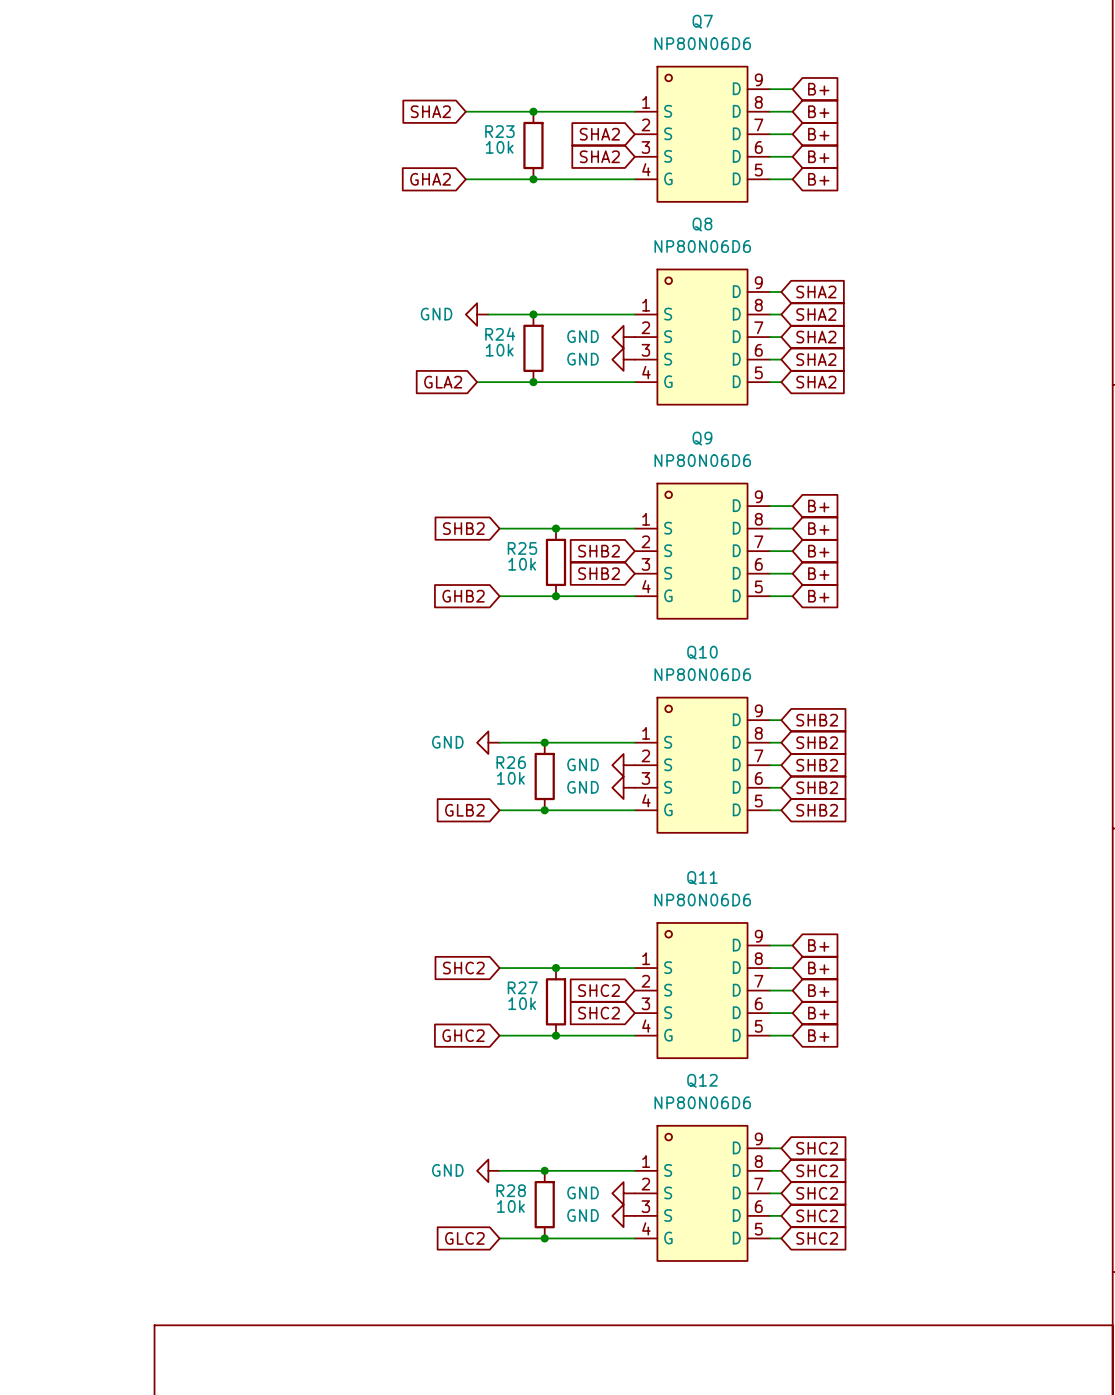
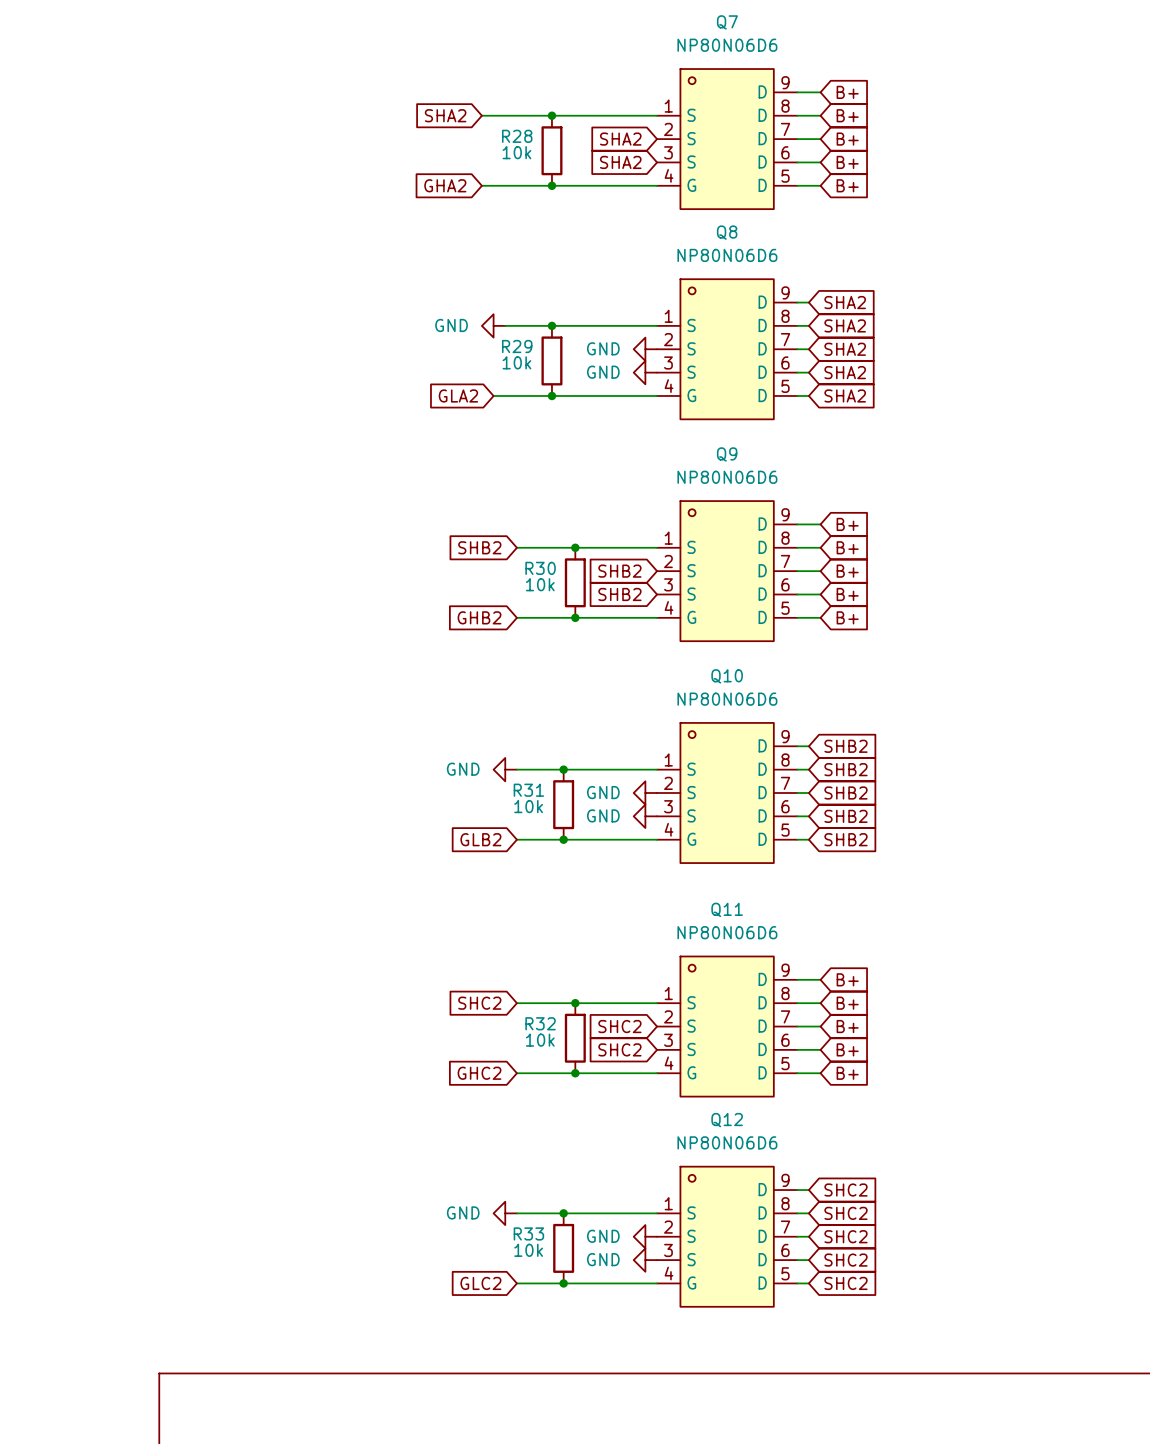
R23 name: R23 (499, 131) -> R28 (517, 136)
R24 name: R24 (500, 334) -> R29 (517, 346)
R25 name: R25 (522, 548) -> R30 (540, 568)
R26 name: R26 (511, 762) -> R31 (528, 790)
R27 name: R27 (522, 987) -> R32 (540, 1023)
R28 name: R28 (511, 1190) -> R33 (528, 1233)

